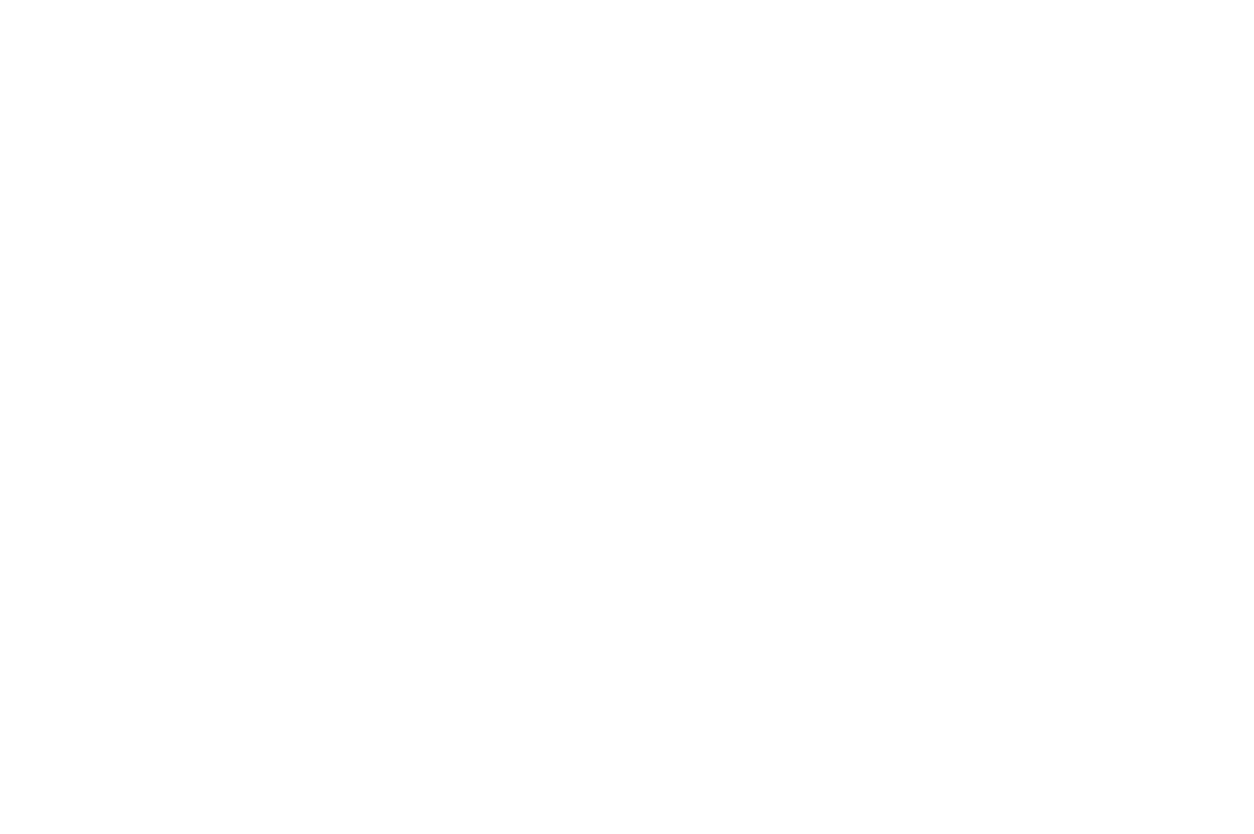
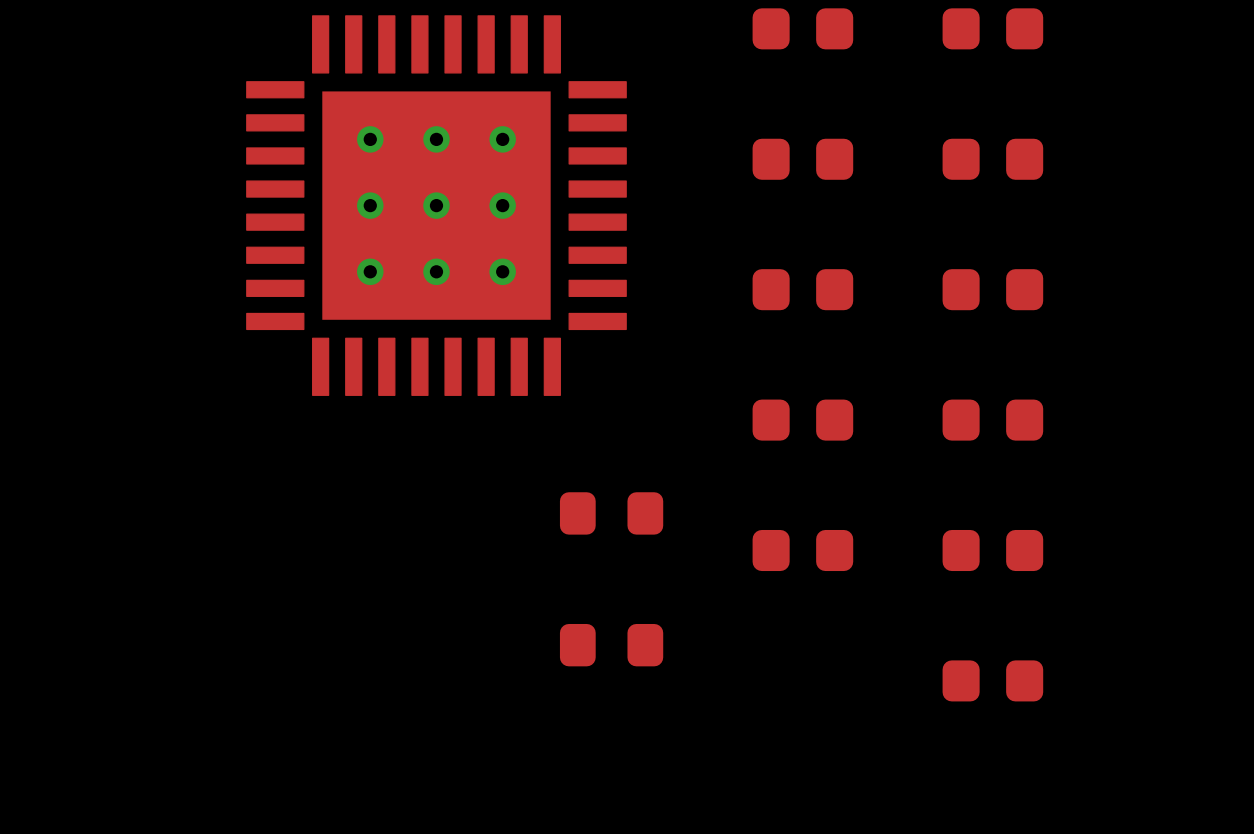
part: none -> (802, 28)
part: none -> (992, 28)
part: none -> (802, 159)
part: none -> (992, 159)
part: none -> (436, 205)
part: none -> (802, 289)
part: none -> (992, 289)
part: none -> (802, 420)
part: none -> (992, 420)
part: none -> (611, 513)
part: none -> (802, 550)
part: none -> (992, 550)
part: none -> (611, 645)
part: none -> (992, 680)

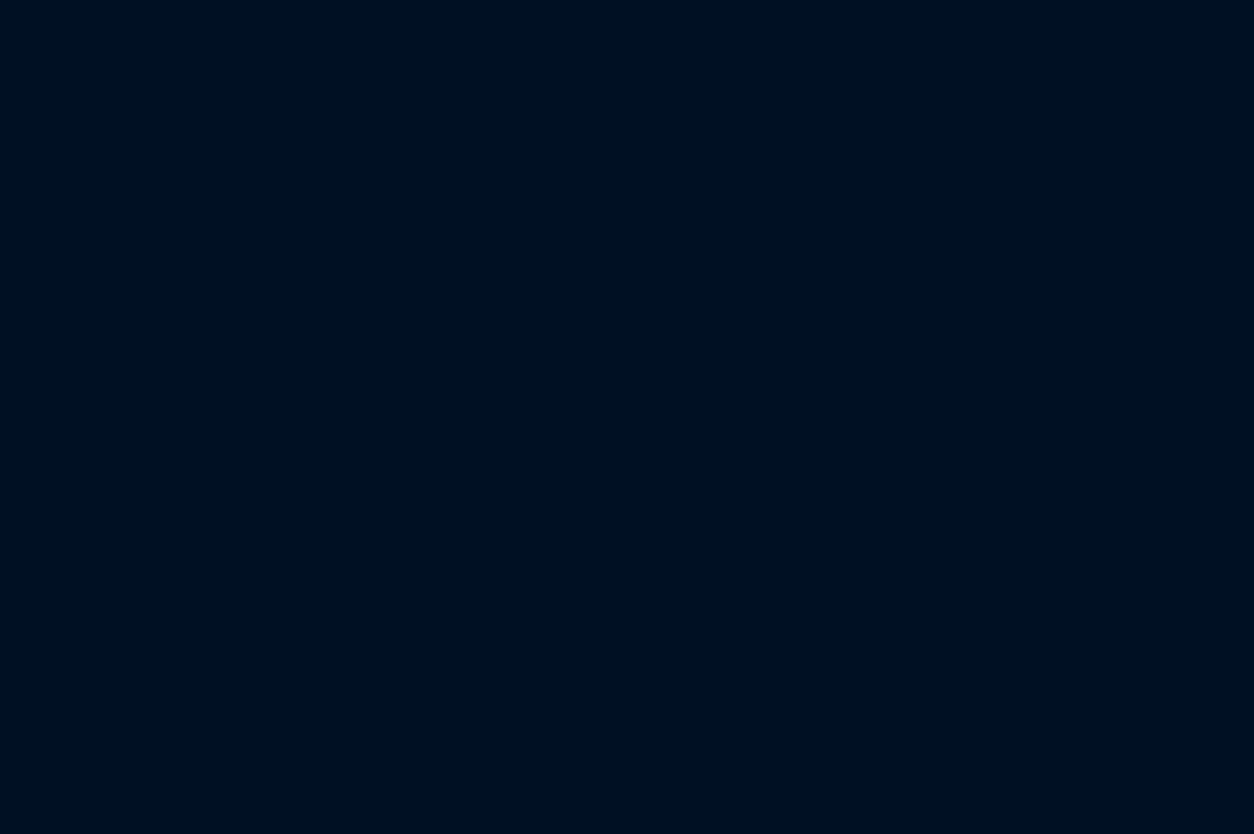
part: (802, 28) -> none
part: (992, 28) -> none
part: (802, 159) -> none
part: (992, 159) -> none
part: (436, 205) -> none
part: (802, 289) -> none
part: (992, 289) -> none
part: (802, 420) -> none
part: (992, 420) -> none
part: (611, 513) -> none
part: (802, 550) -> none
part: (992, 550) -> none
part: (611, 645) -> none
part: (992, 680) -> none

